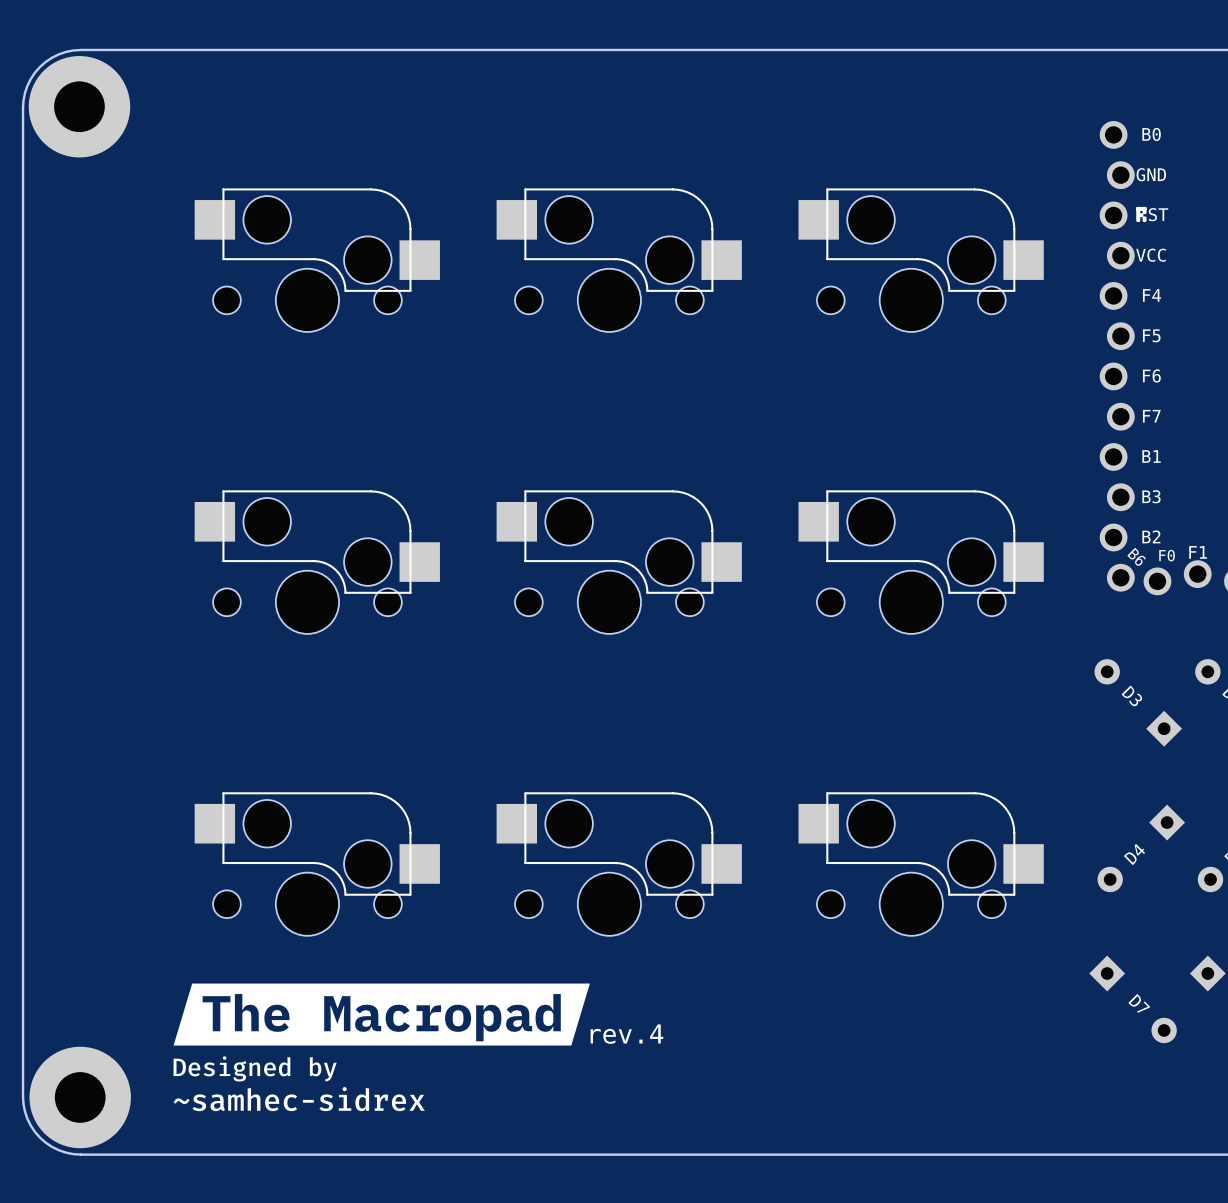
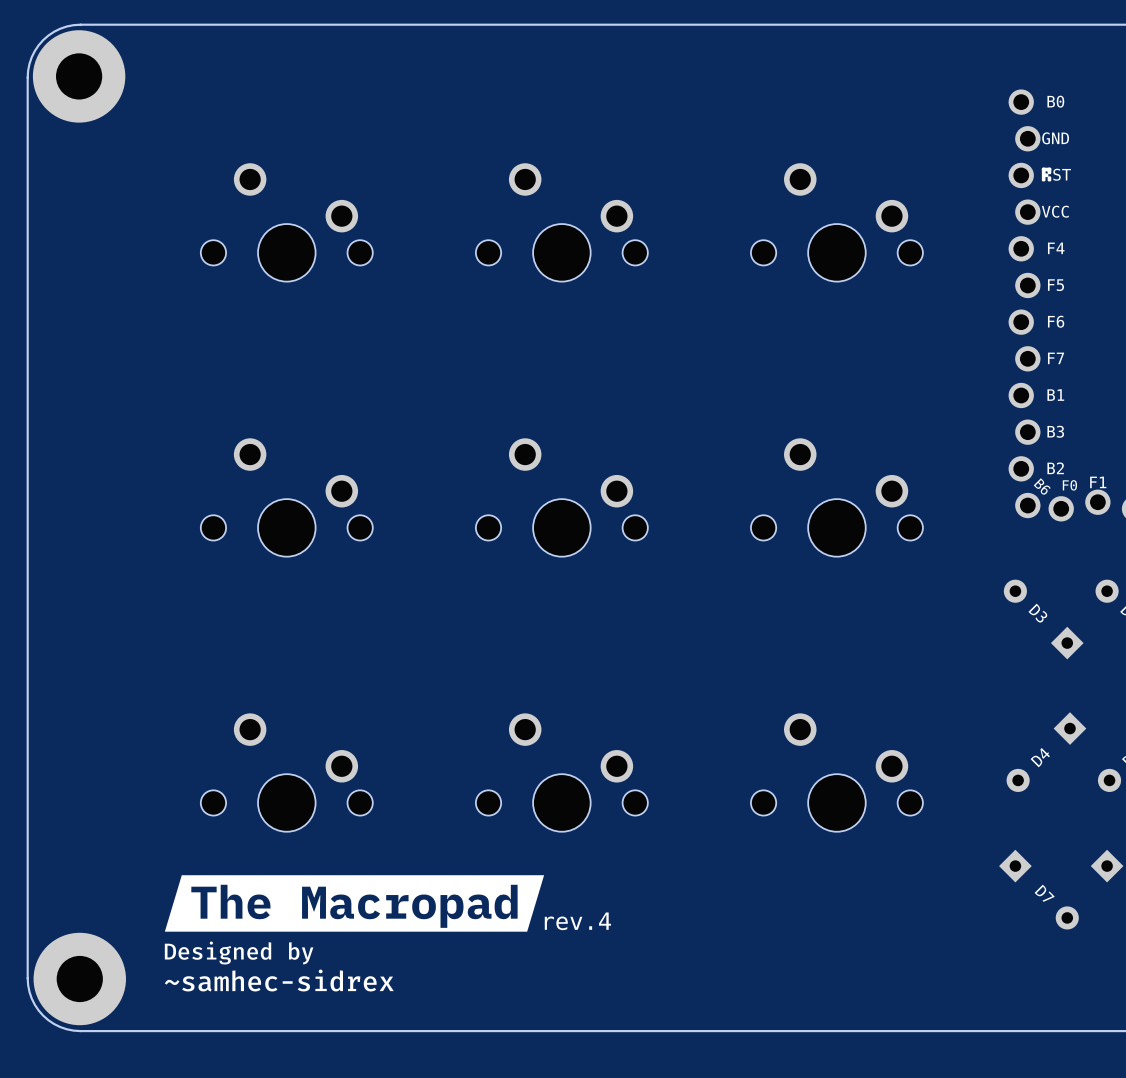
part footprint: [194, 188, 440, 332] -> [200, 163, 373, 282]
part footprint: [496, 188, 742, 332] -> [475, 163, 648, 282]
part footprint: [798, 188, 1044, 332] -> [750, 163, 923, 282]
part footprint: [194, 490, 440, 634] -> [200, 438, 373, 557]
part footprint: [496, 490, 742, 634] -> [475, 438, 648, 557]
part footprint: [798, 490, 1044, 634] -> [750, 438, 923, 557]
part footprint: [194, 792, 440, 936] -> [200, 713, 373, 832]
part footprint: [496, 792, 742, 936] -> [475, 713, 648, 832]
part footprint: [798, 792, 1044, 936] -> [750, 713, 923, 832]

